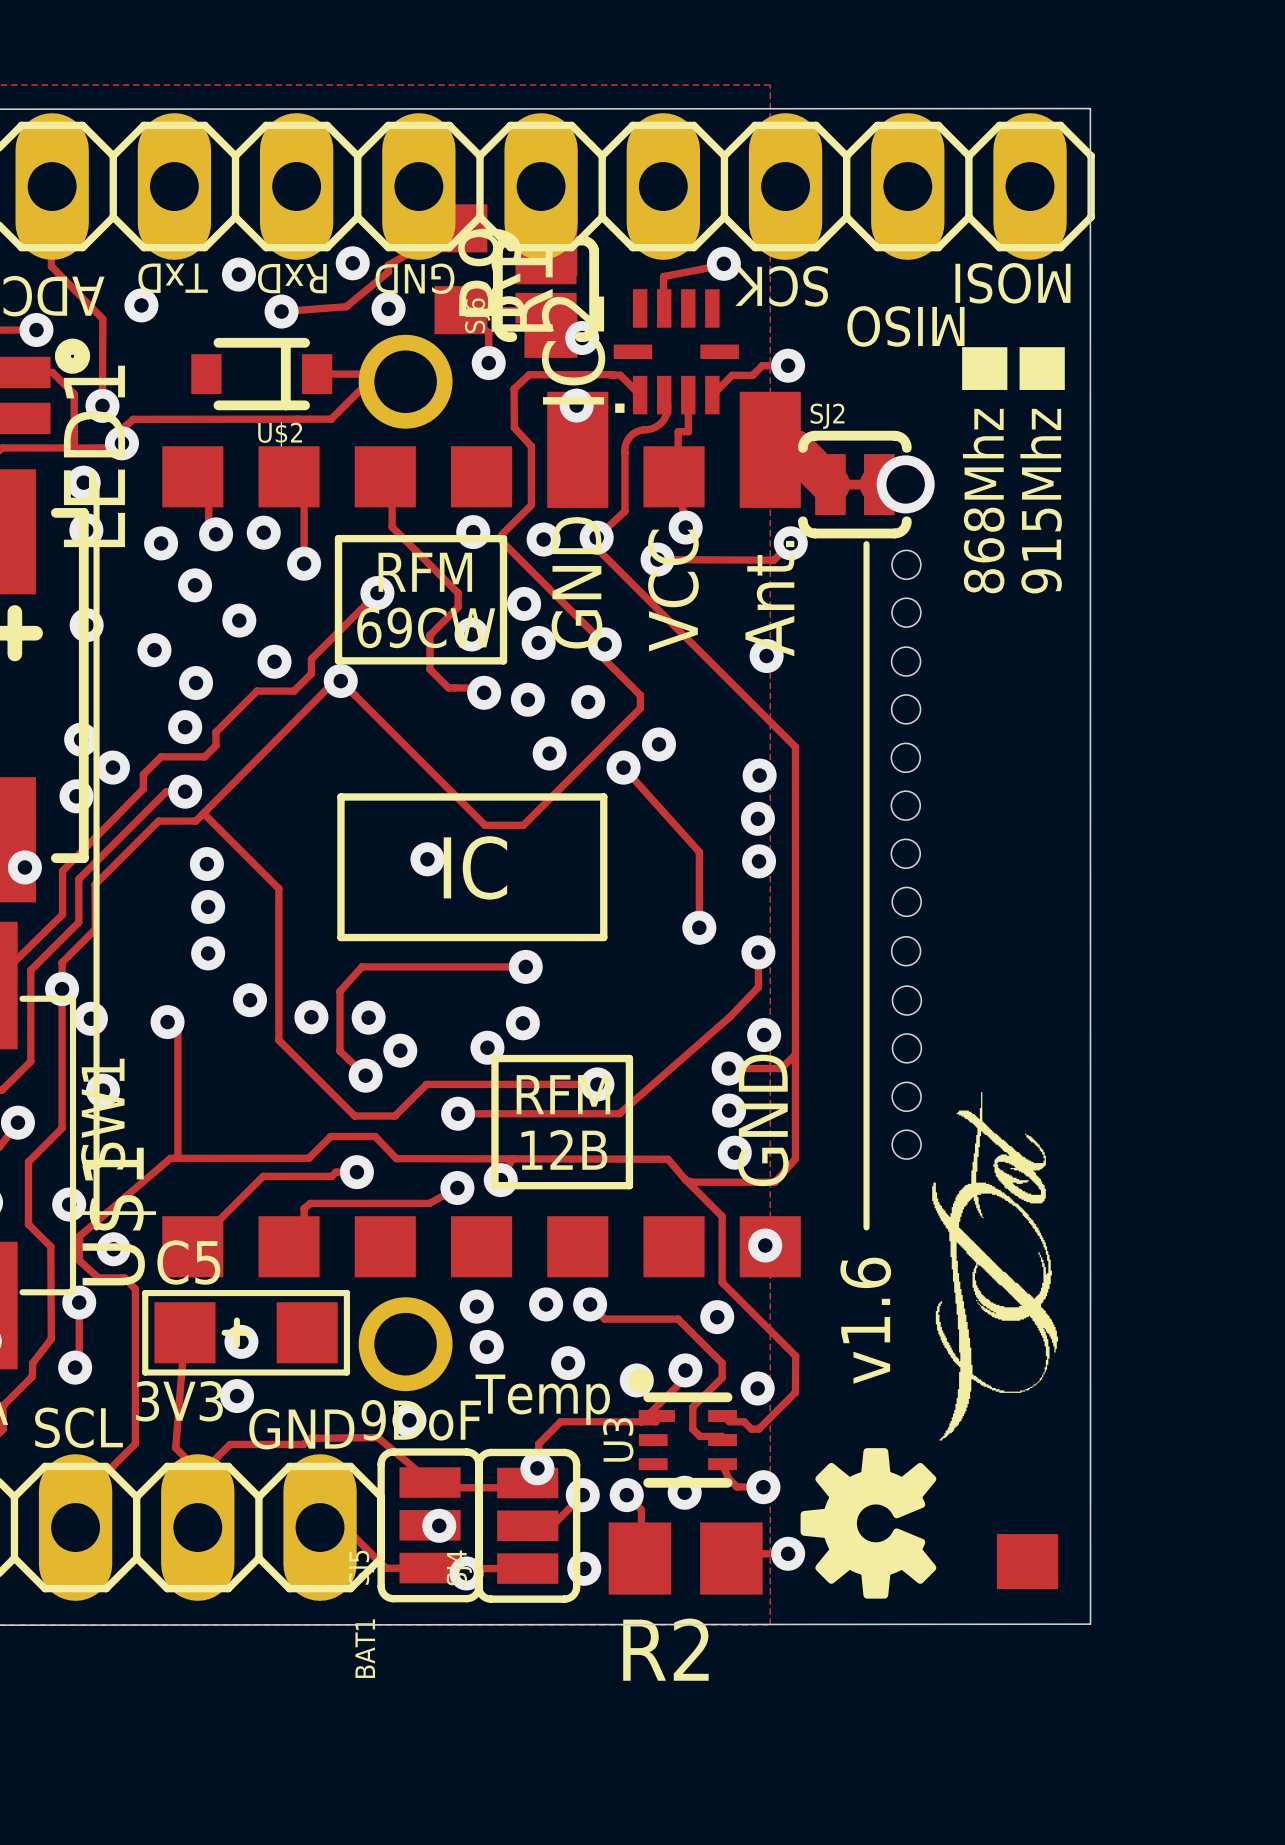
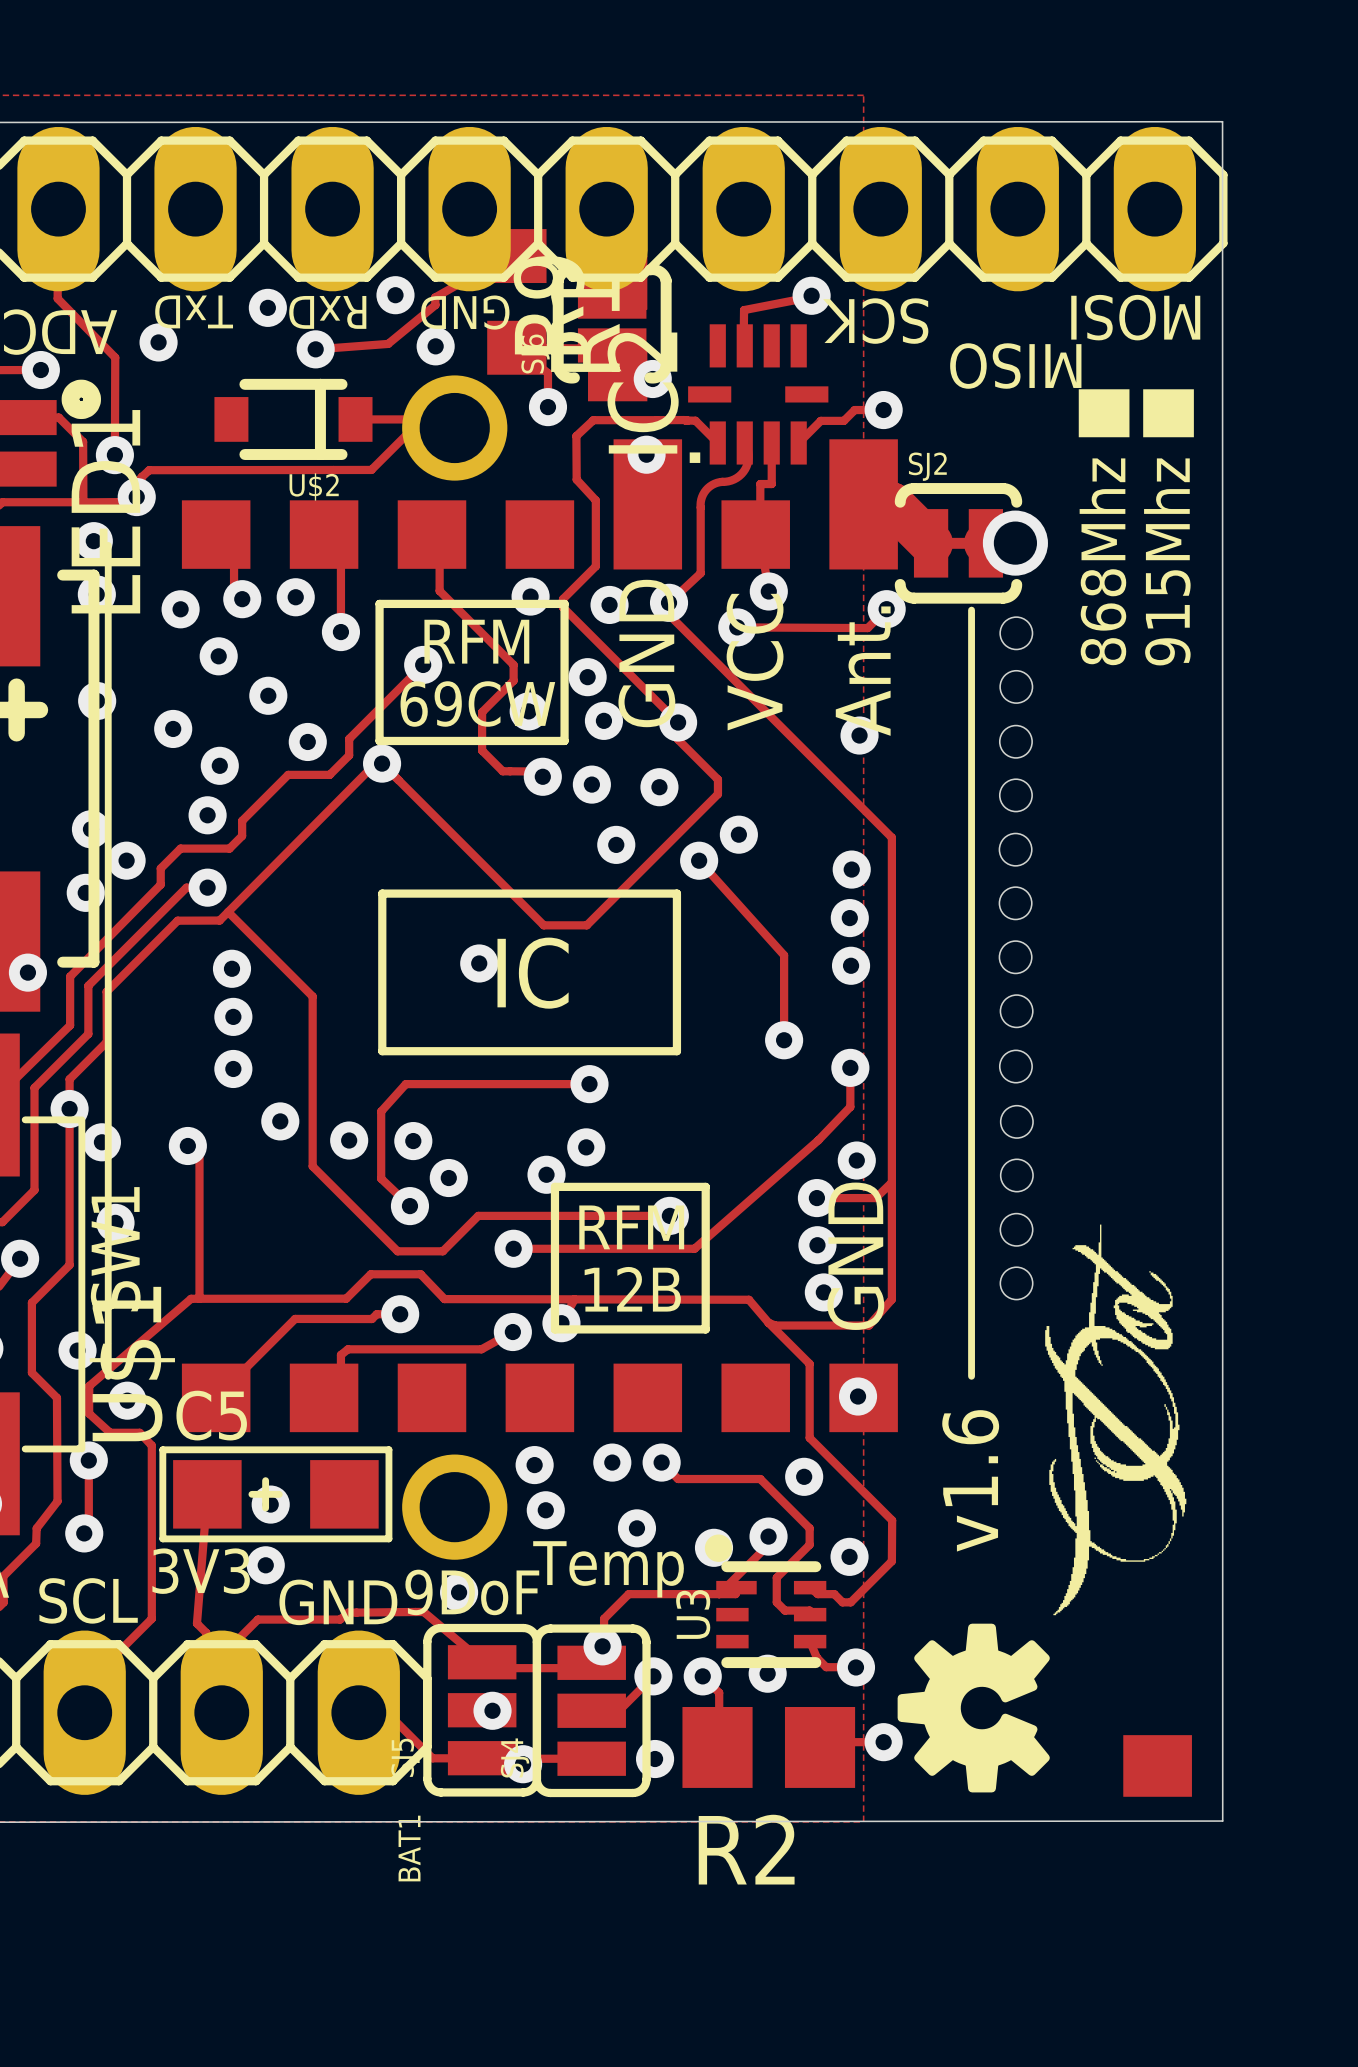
drawing position: (1027, 1561) -> (1157, 1765)

